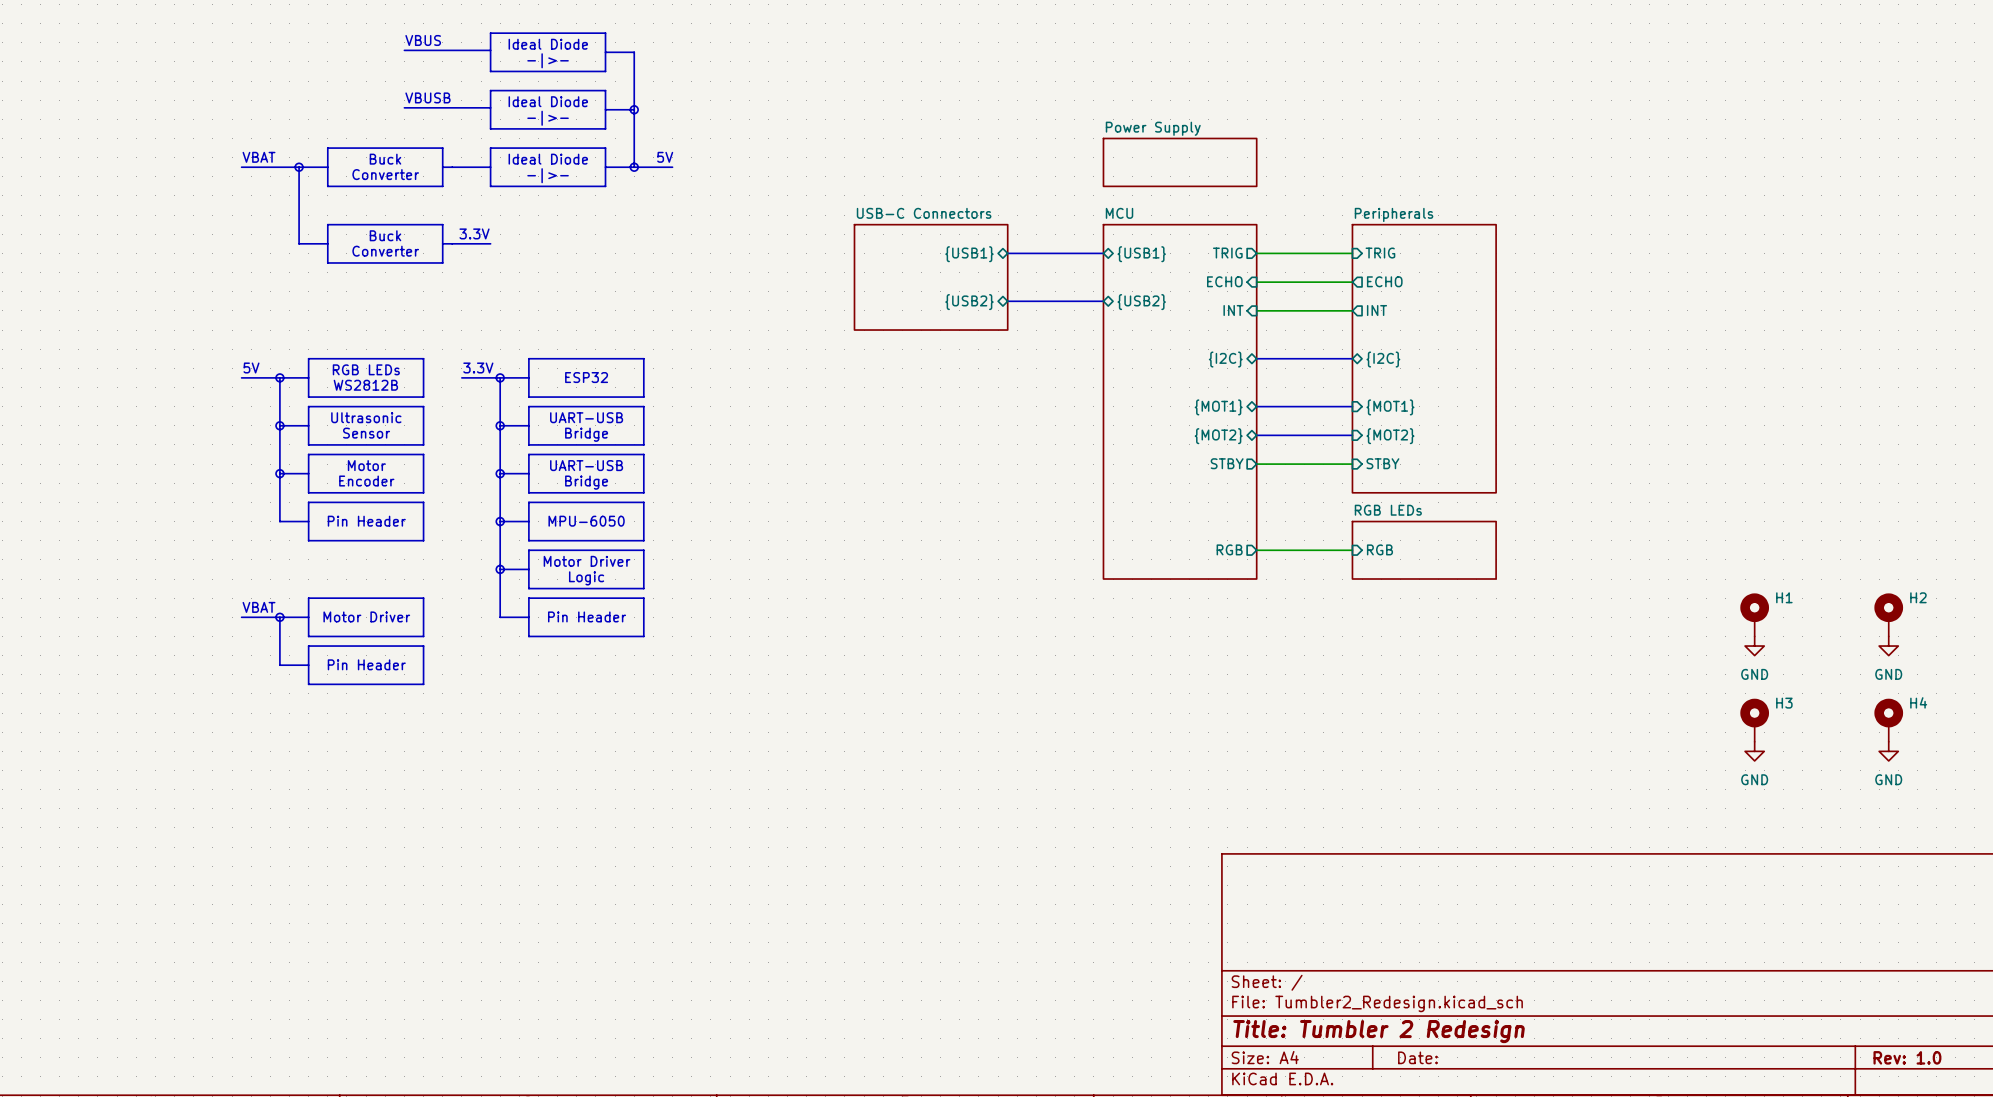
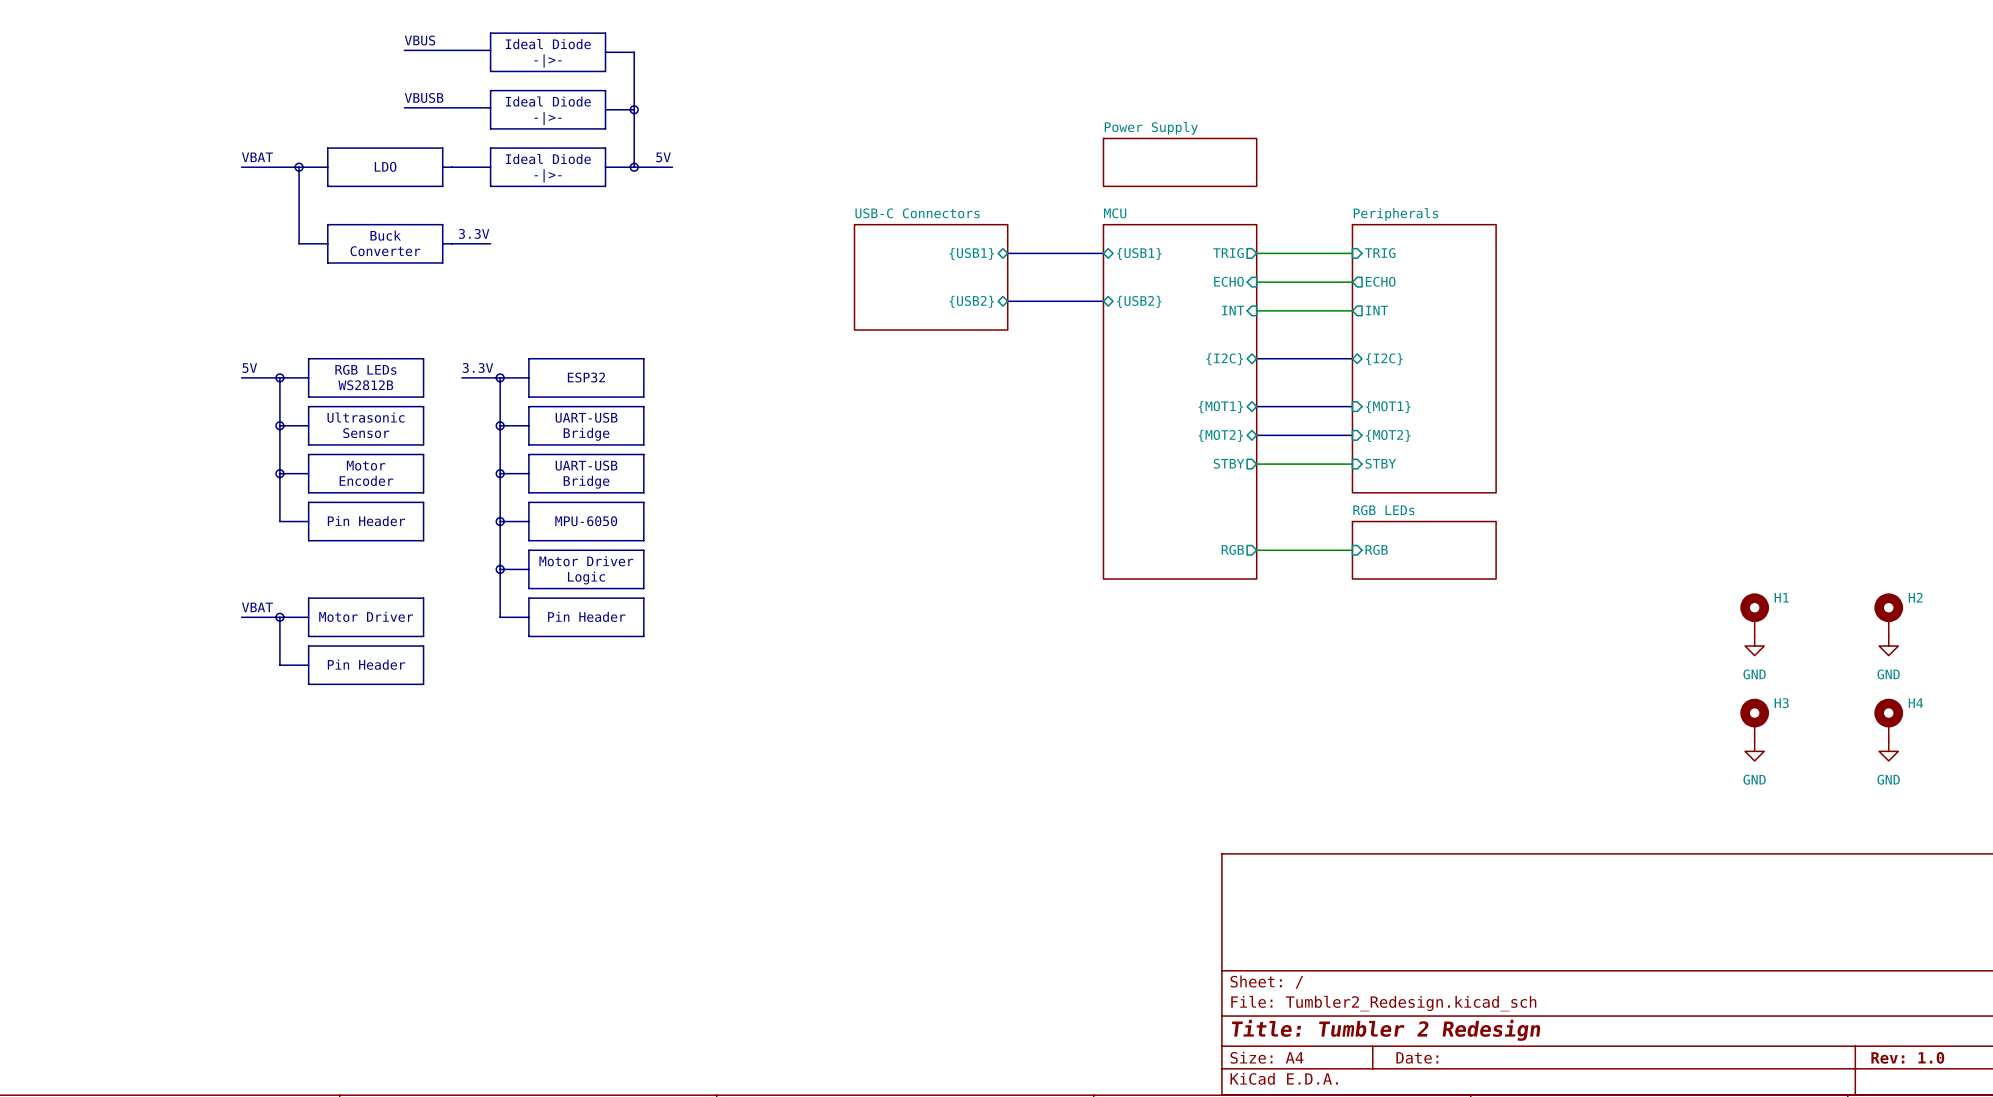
text: Buck (385, 159) -> none
text: none -> LDO (385, 166)
text: Converter (385, 174) -> none

